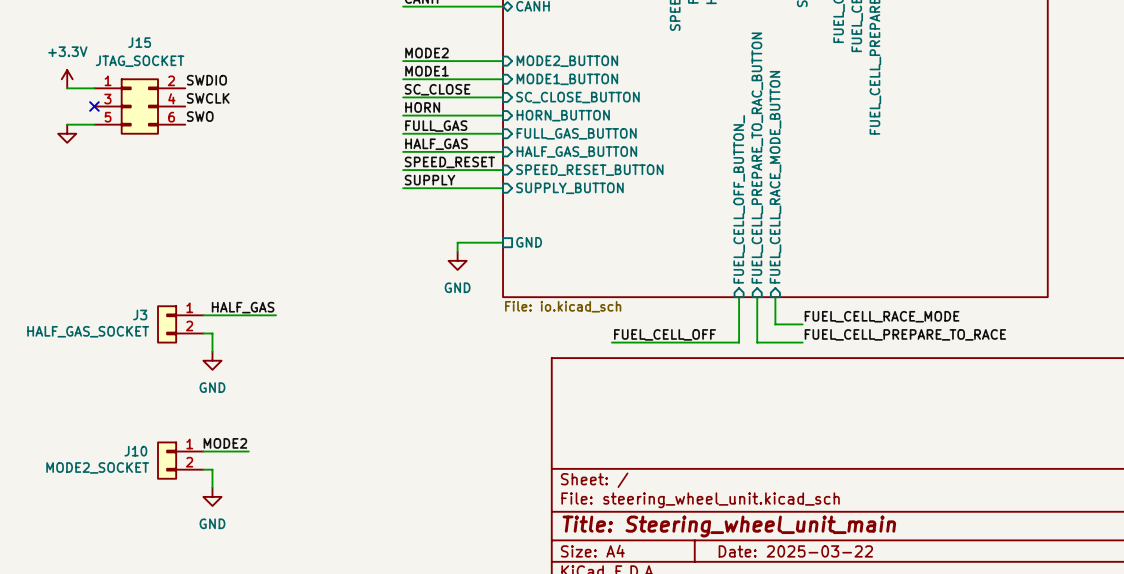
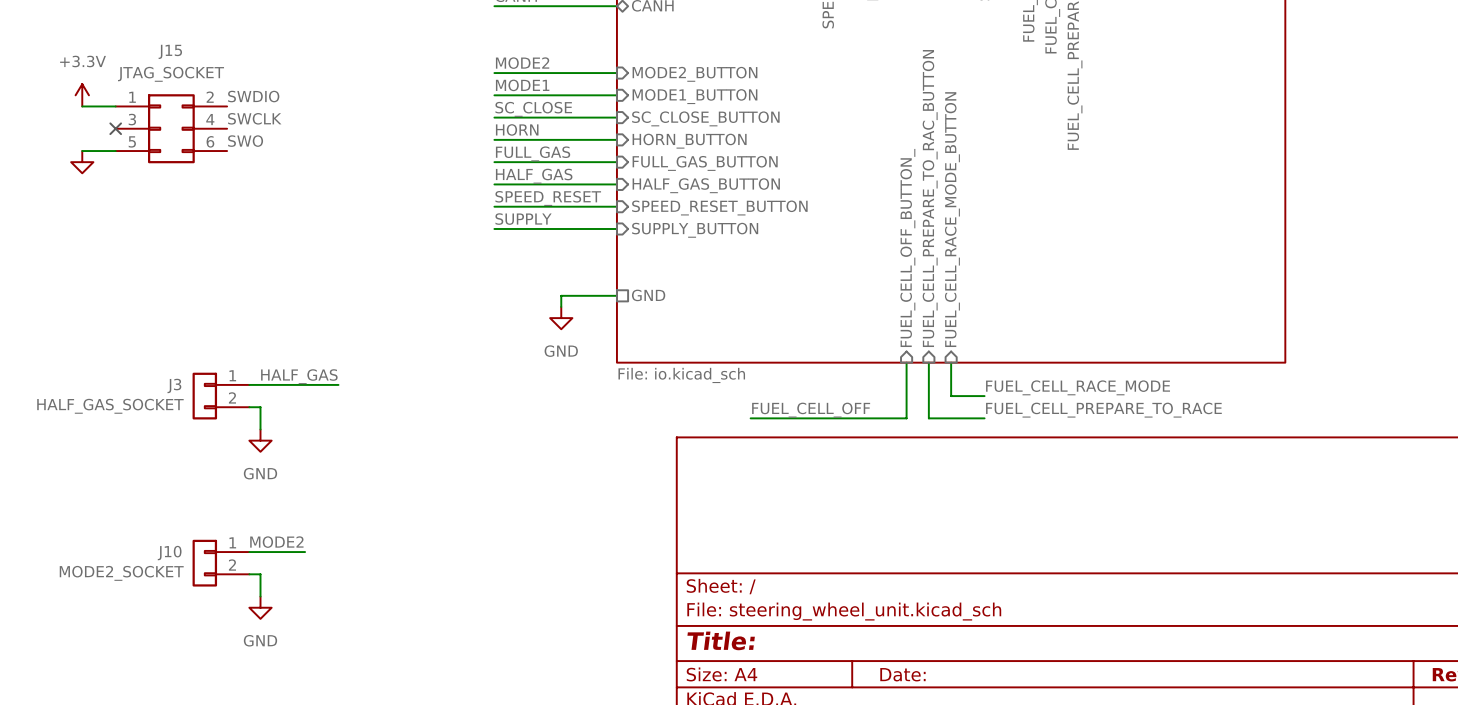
title block: Title: Steering_wheel_unit_main (729, 526) -> Title: (721, 640)
title block: Date: 2025-03-22 (795, 551) -> Date: (902, 674)

